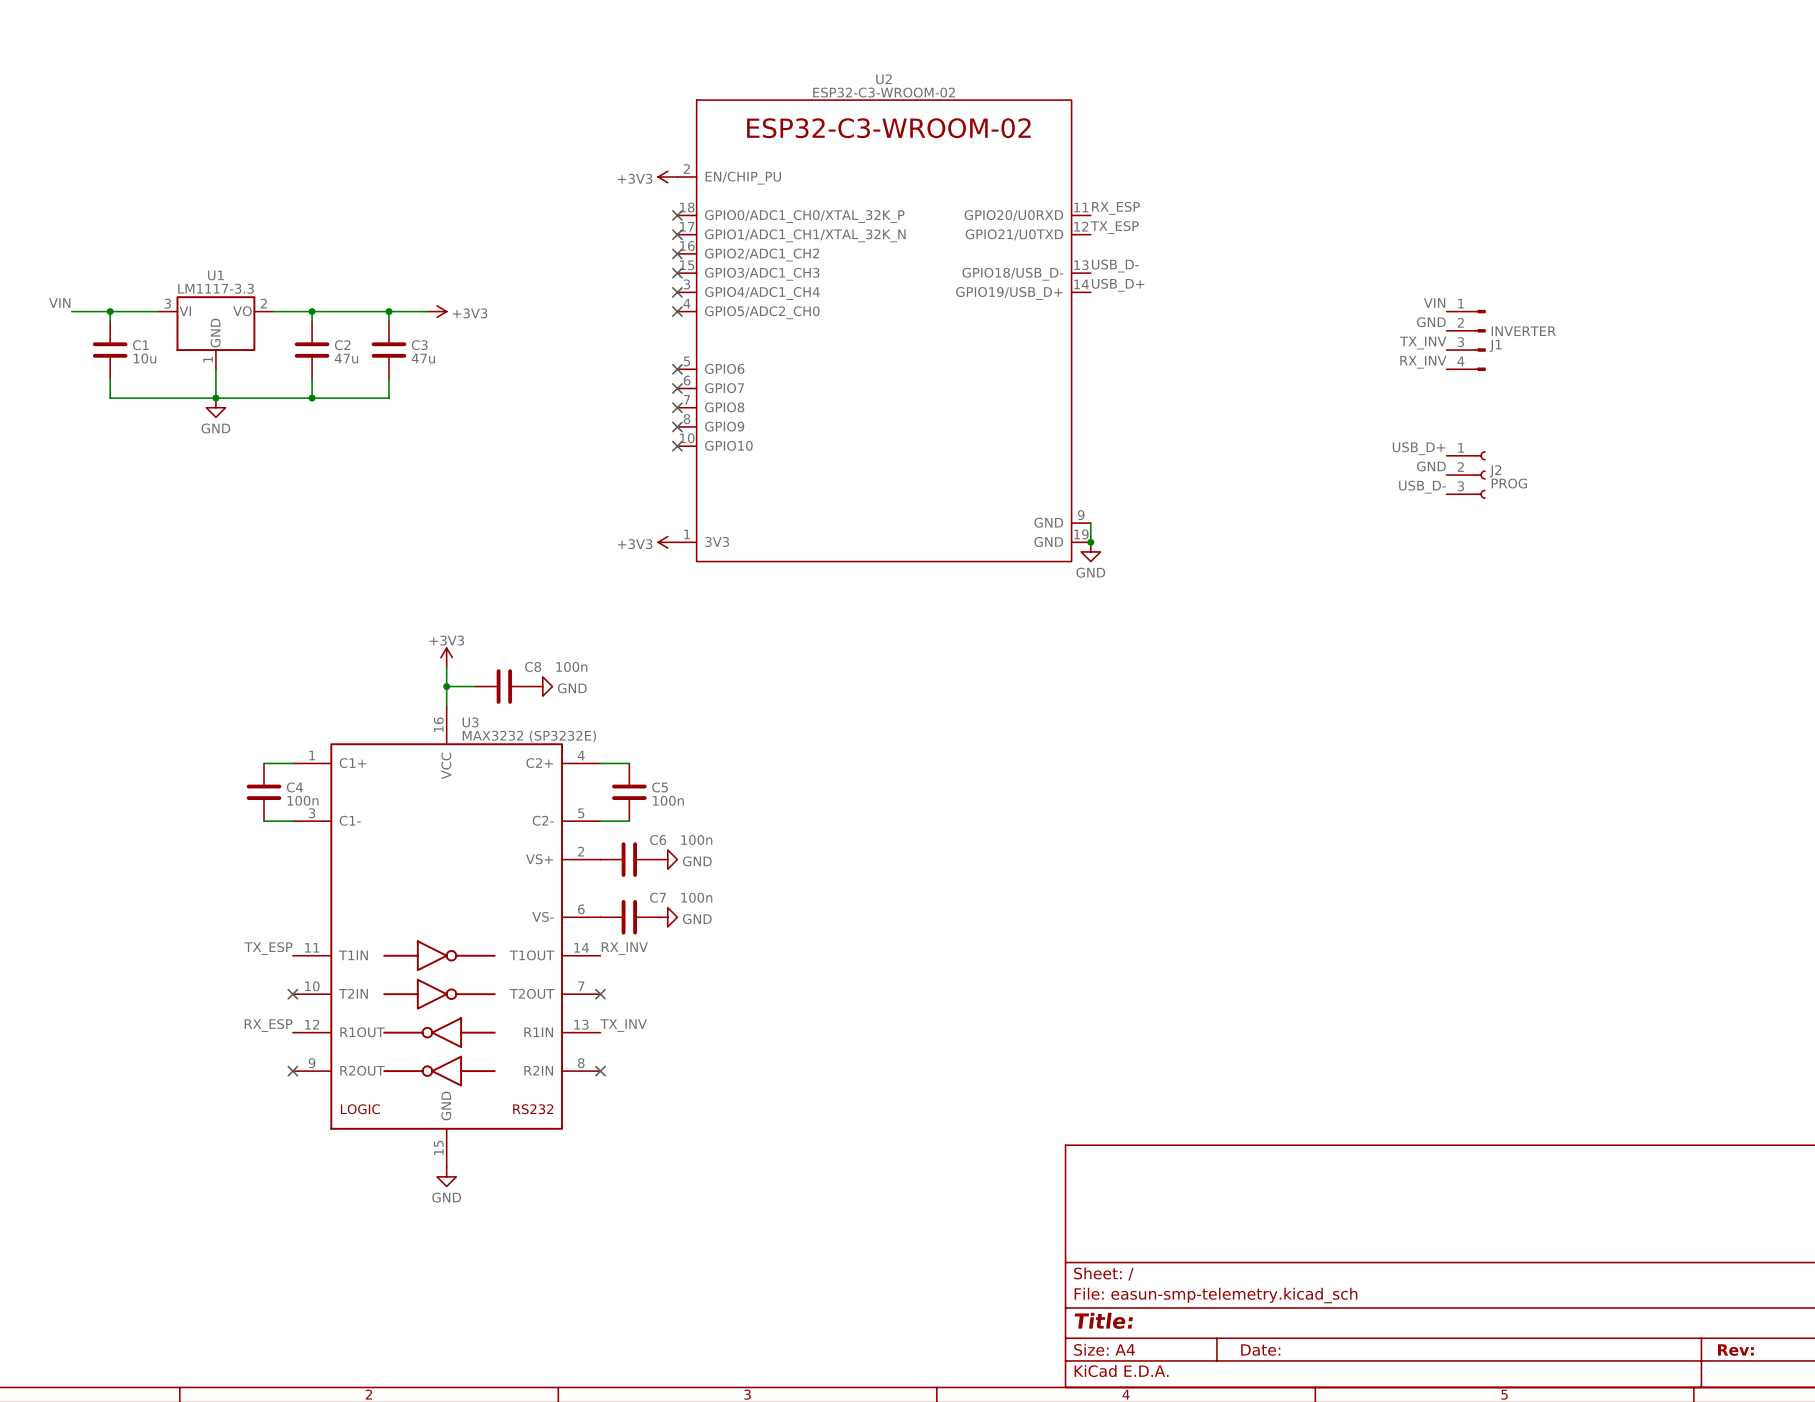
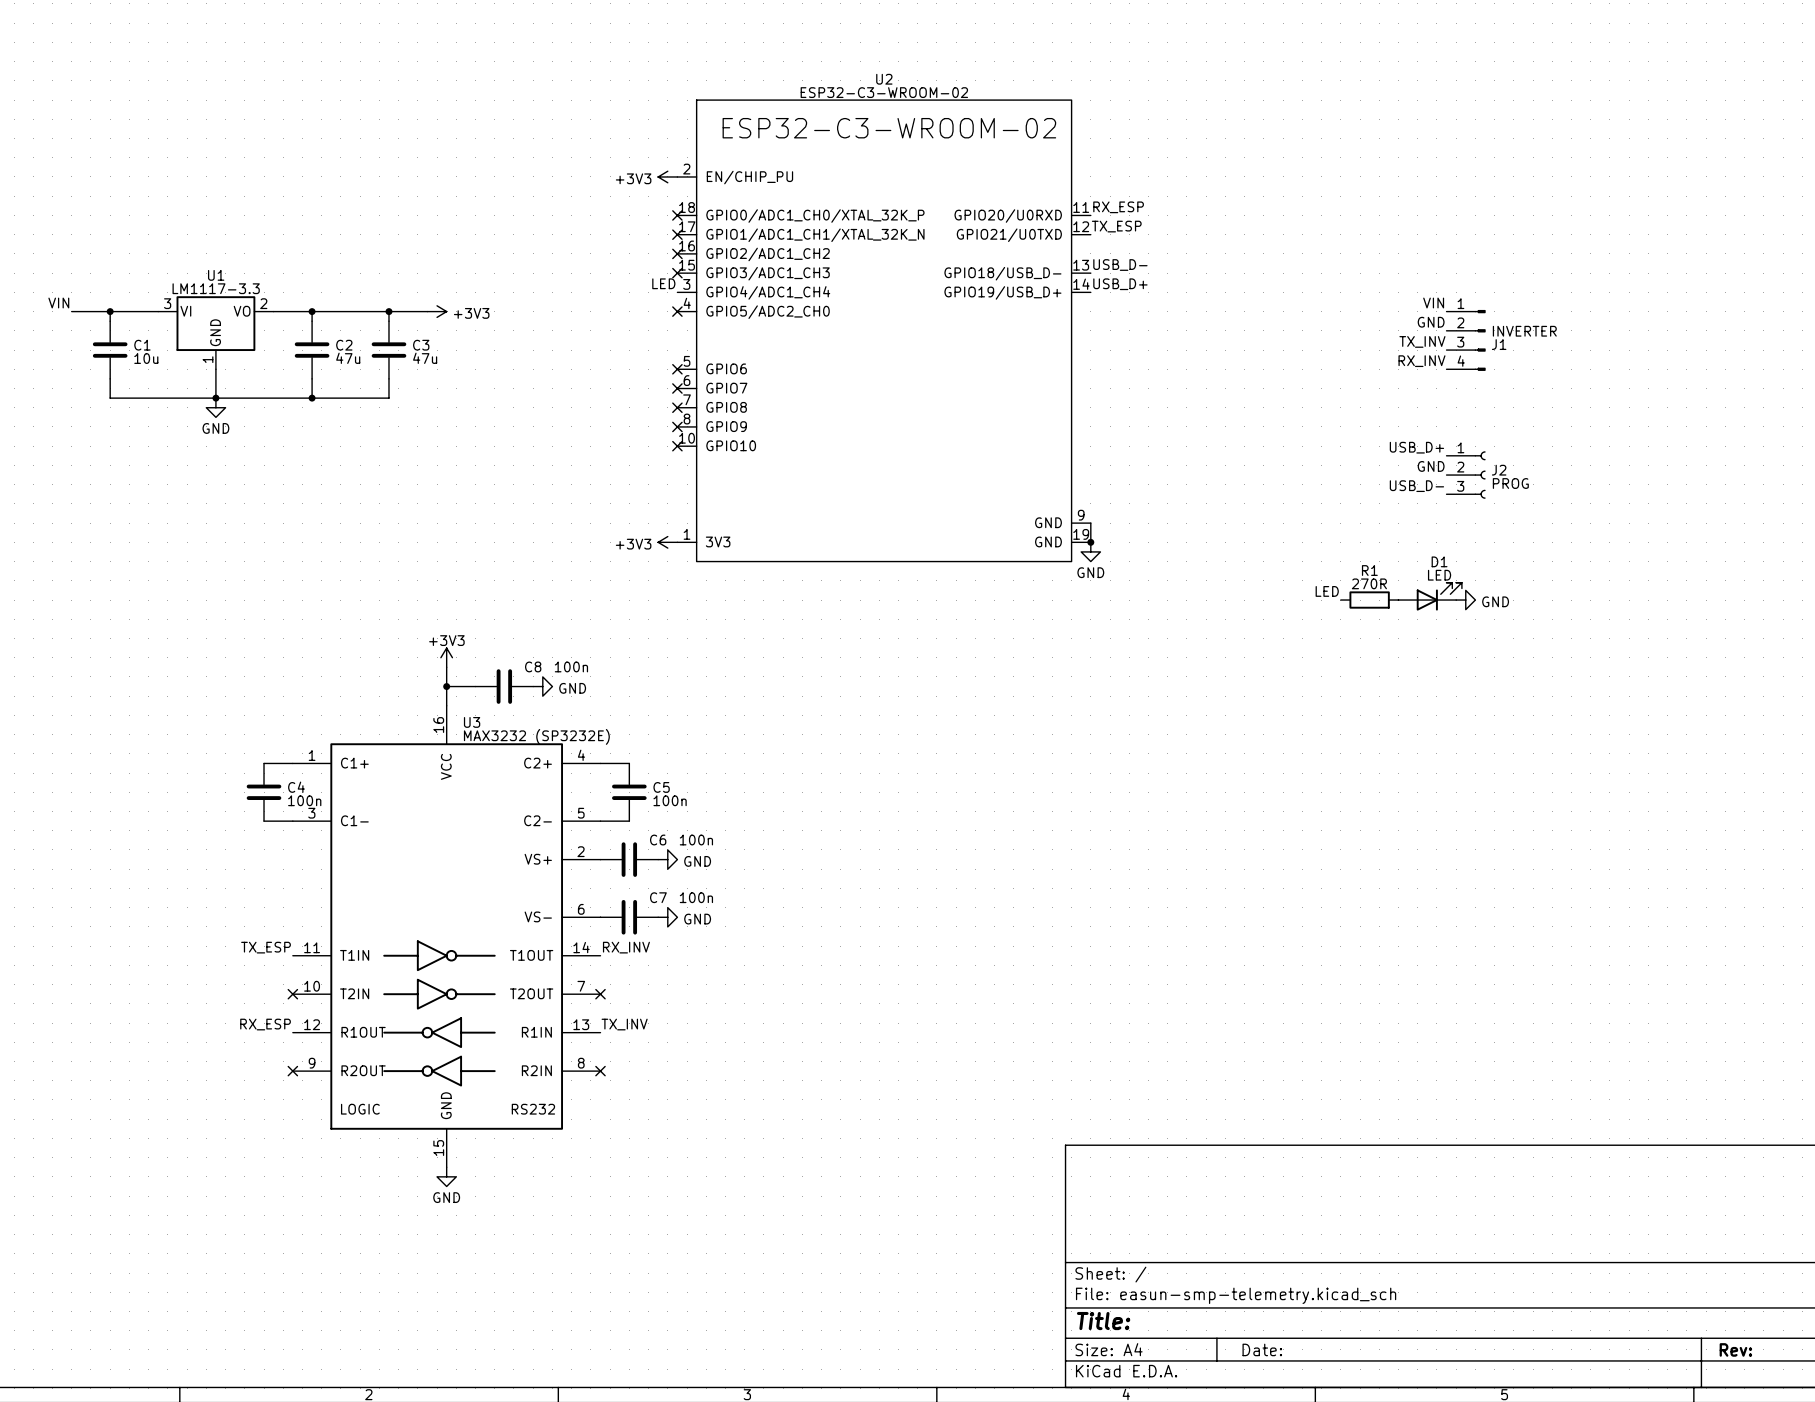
label: none -> LED (663, 283)
no-connect mark: (677, 292) -> none
label: none -> LED (1327, 591)
D1: none -> LED (1430, 596)
R1: none -> 270R (1369, 600)
power symbol: none -> GND (1465, 600)

